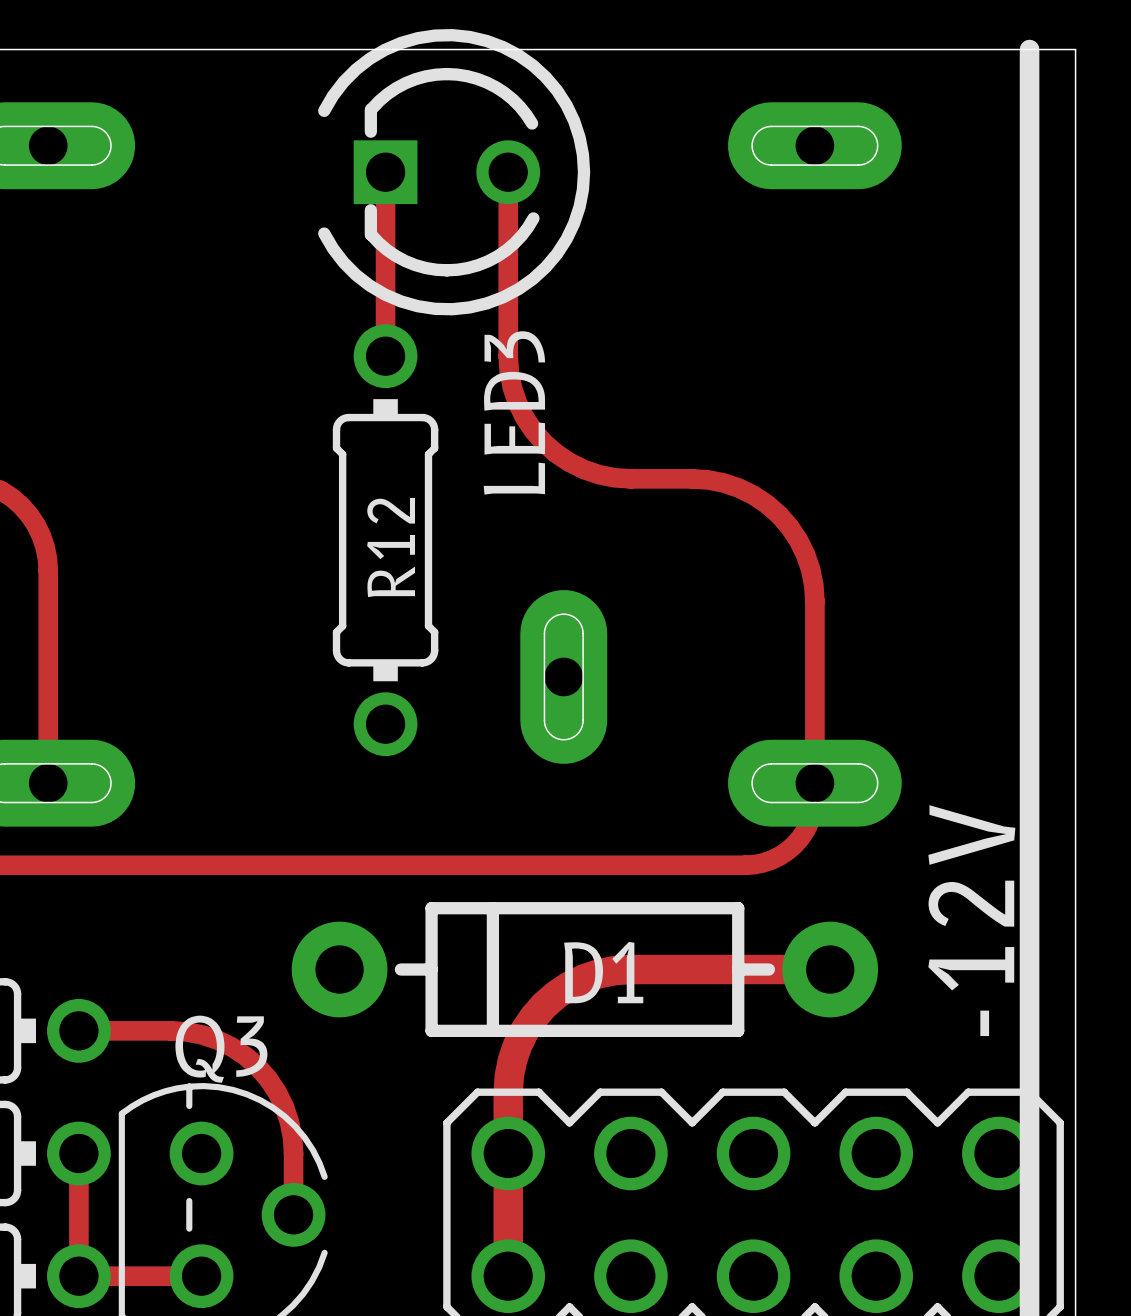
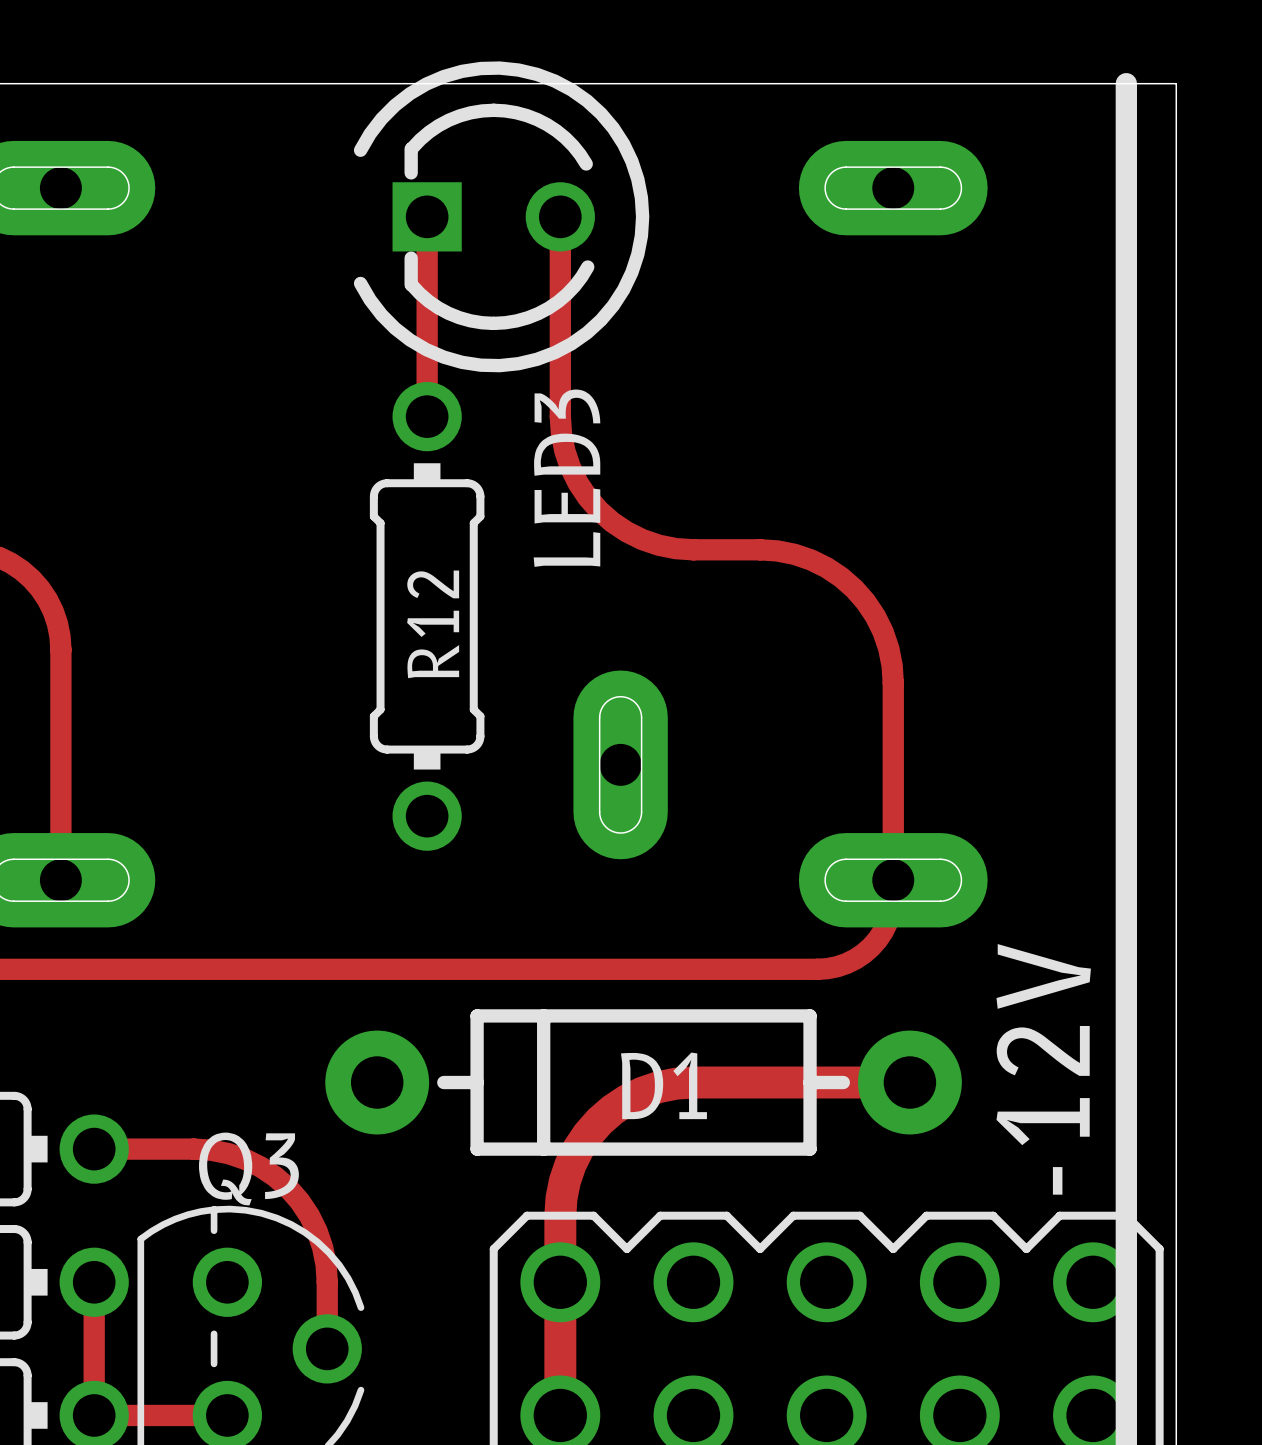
text position: -12V (971, 920) -> -12V (1043, 1069)

